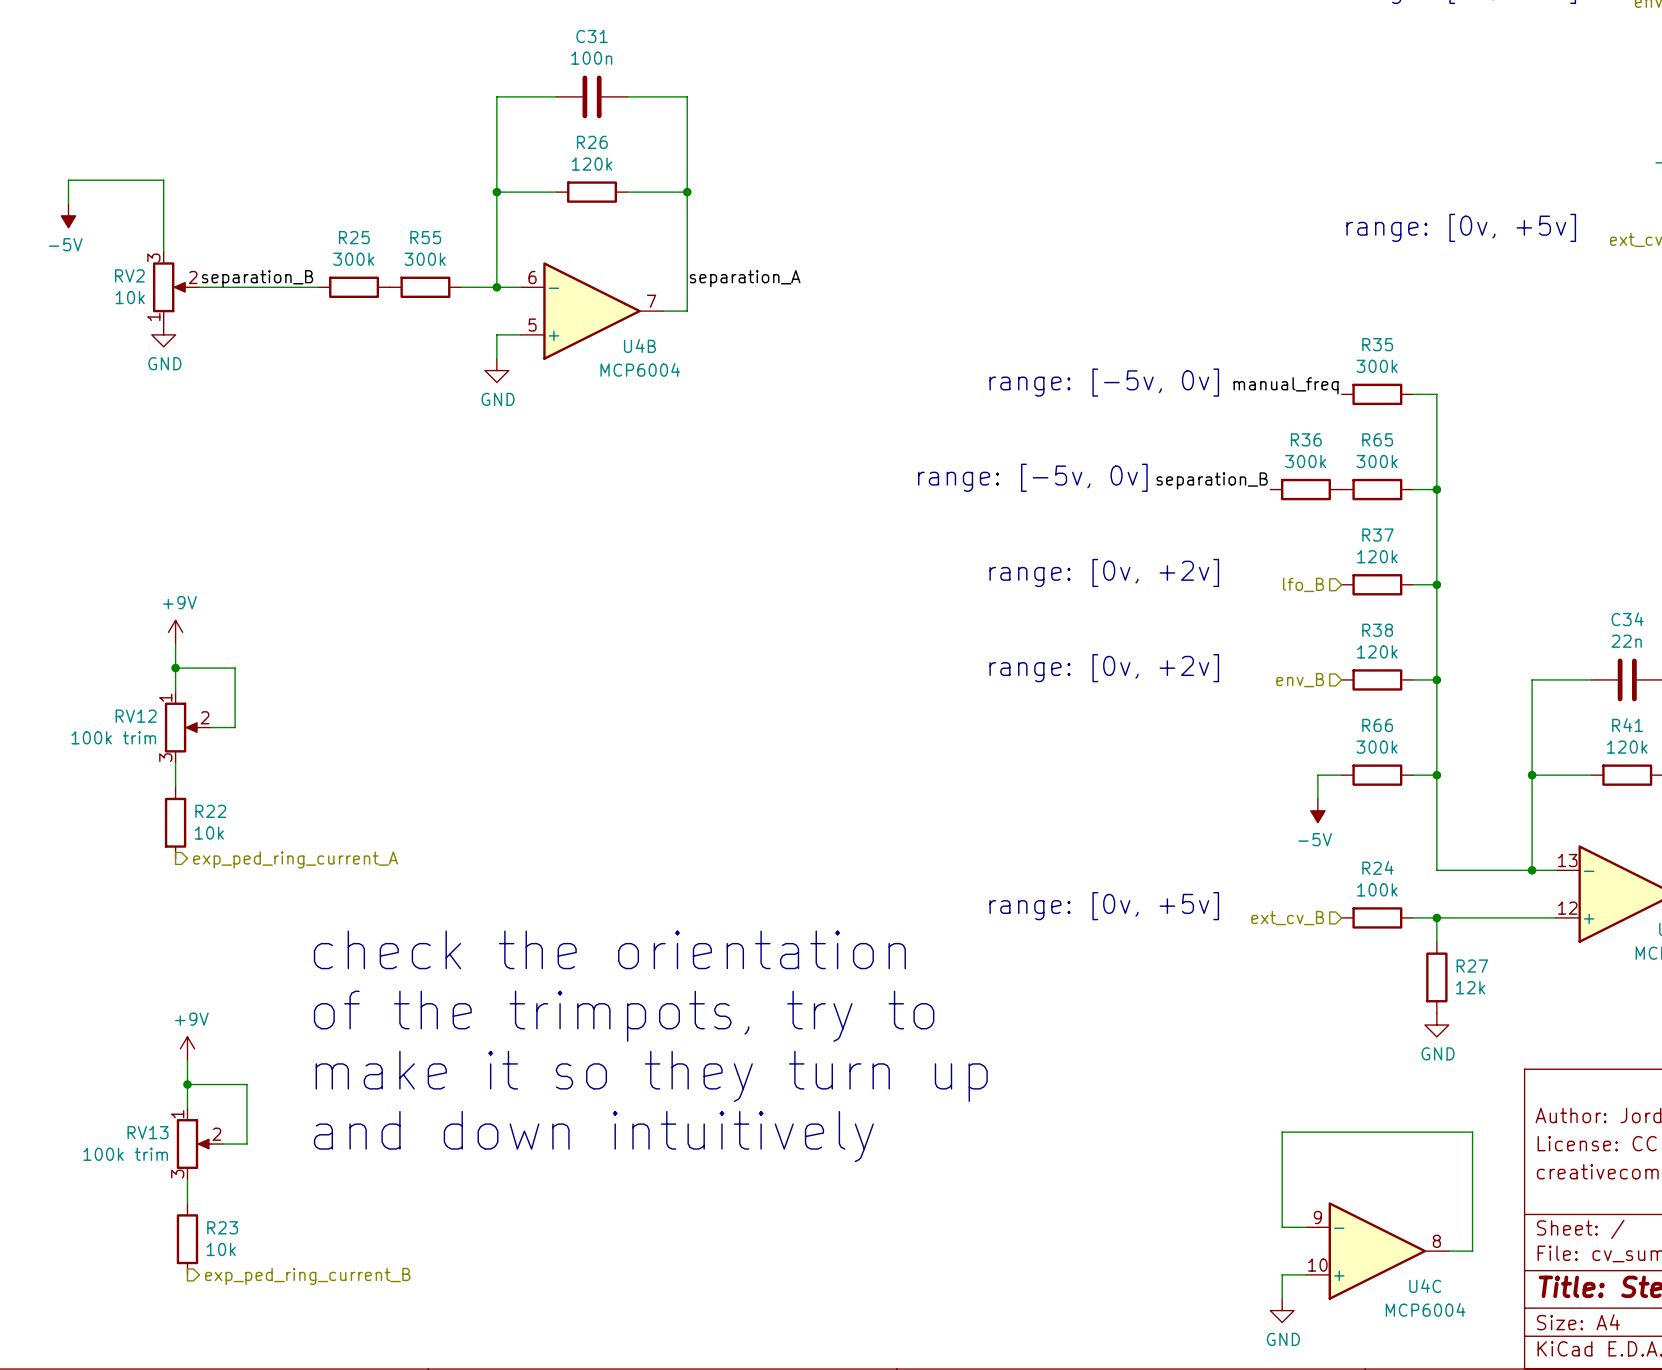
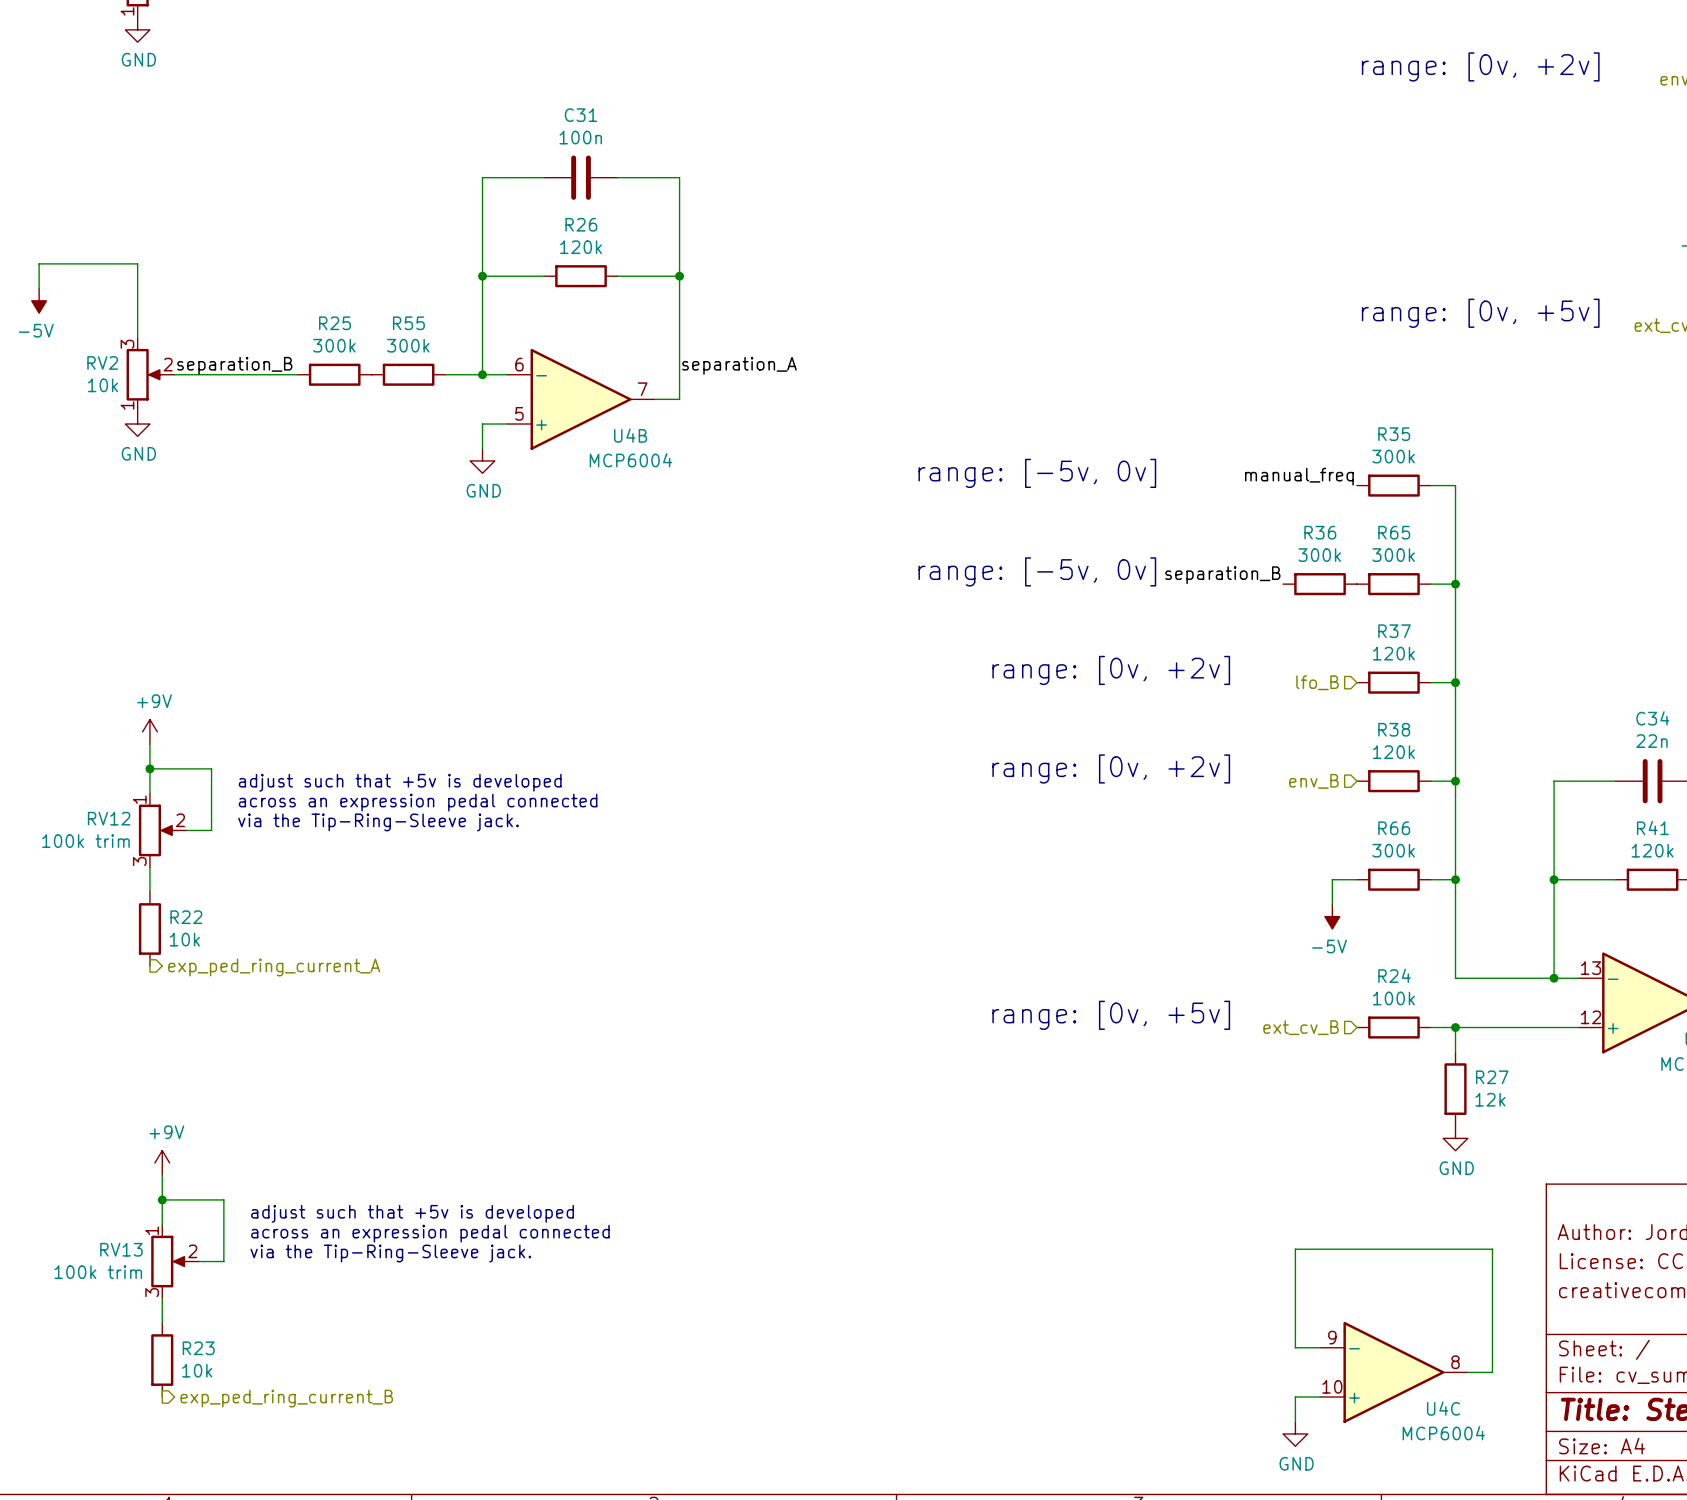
text position: range: [-5v, 0v] (1104, 382) -> range: [-5v, 0v] (1037, 473)
text: none -> adjust such that +5v is developed (400, 782)
text: none -> across an expression pedal connected (418, 802)
text: none -> via the Tip-Ring-Sleeve jack. (378, 822)
text: check the orientation (609, 949) -> none
text: of the trimpots, try to (624, 1016) -> none
text: make it so they turn up (651, 1076) -> none
text: none -> adjust such that +5v is developed (412, 1213)
text: none -> across an expression pedal connected (430, 1233)
text: none -> via the Tip-Ring-Sleeve jack. (390, 1253)
text: and down intuitively (593, 1136) -> none

